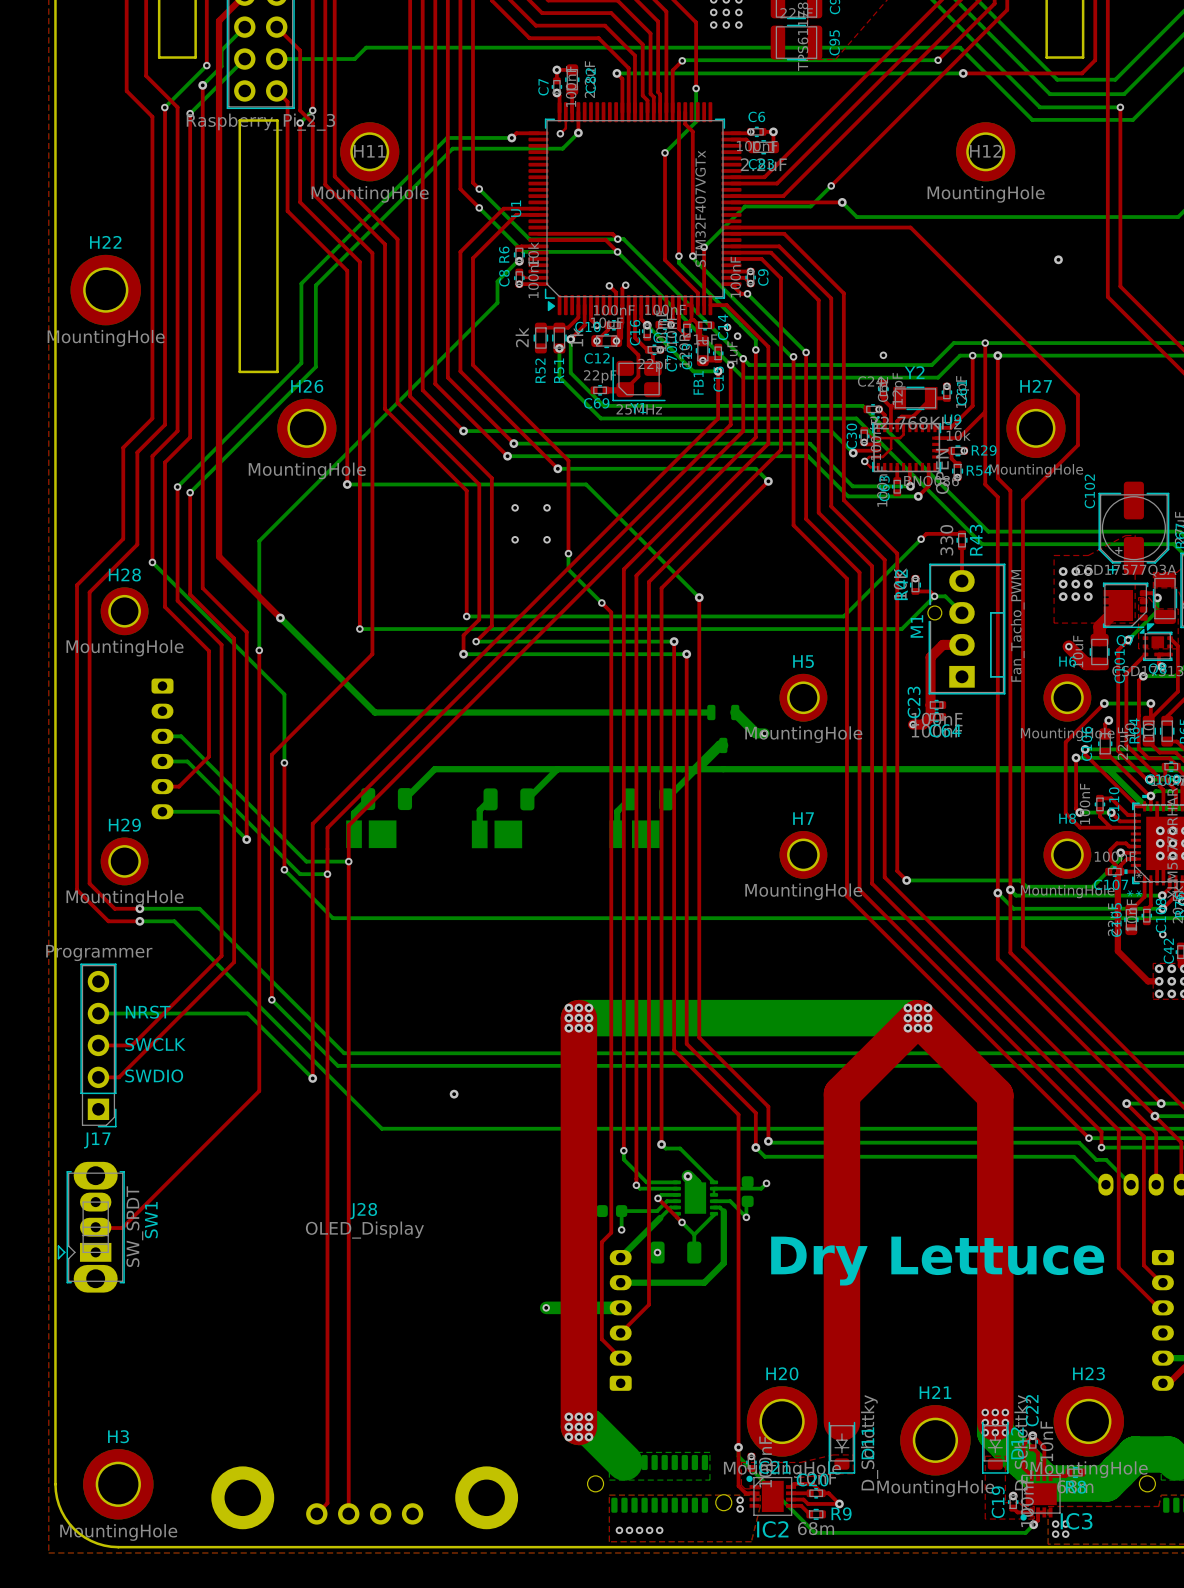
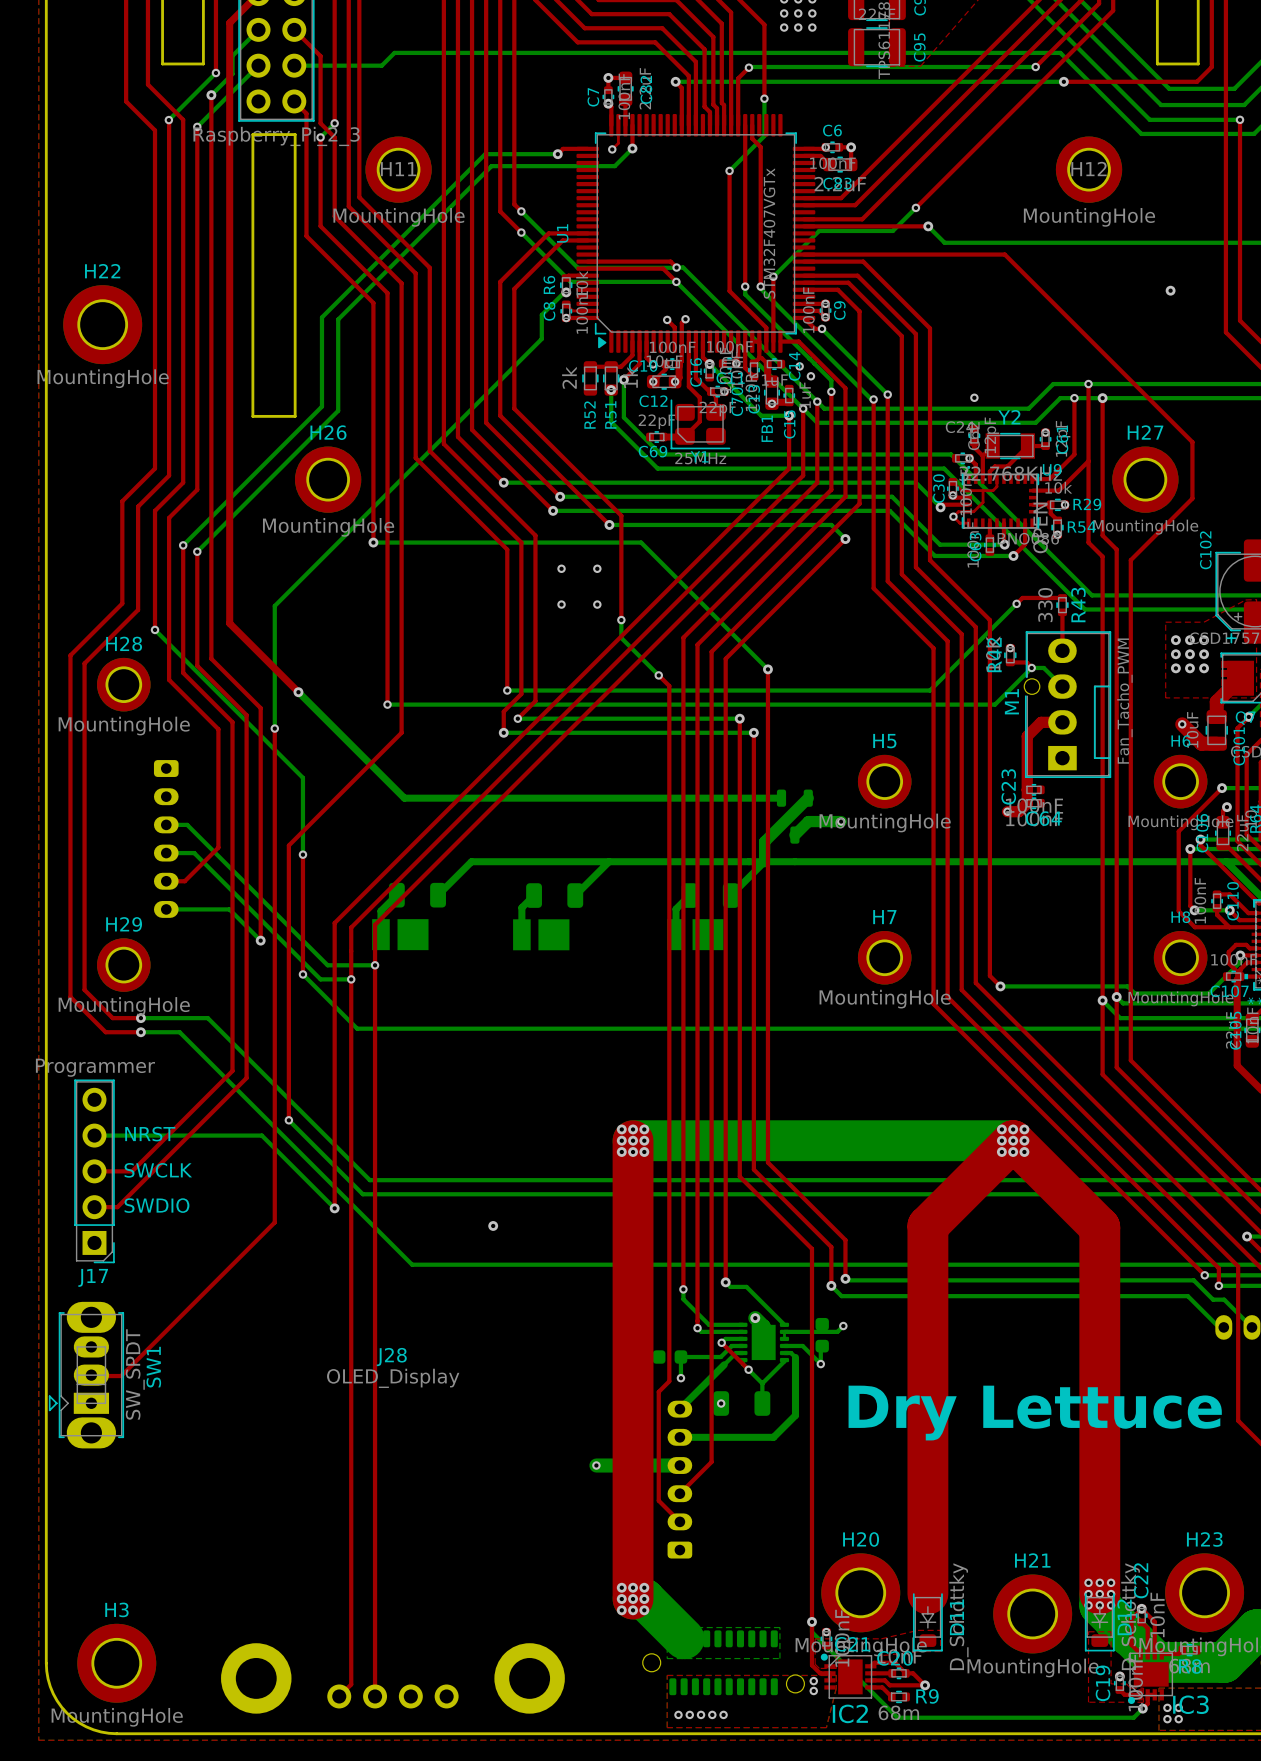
bottom track: (735, 712) (756, 733) -> (794, 835) (808, 821) (831, 821)
bottom track: (723, 745) (720, 745) (696, 769) -> (808, 798) (764, 841) (764, 861)

